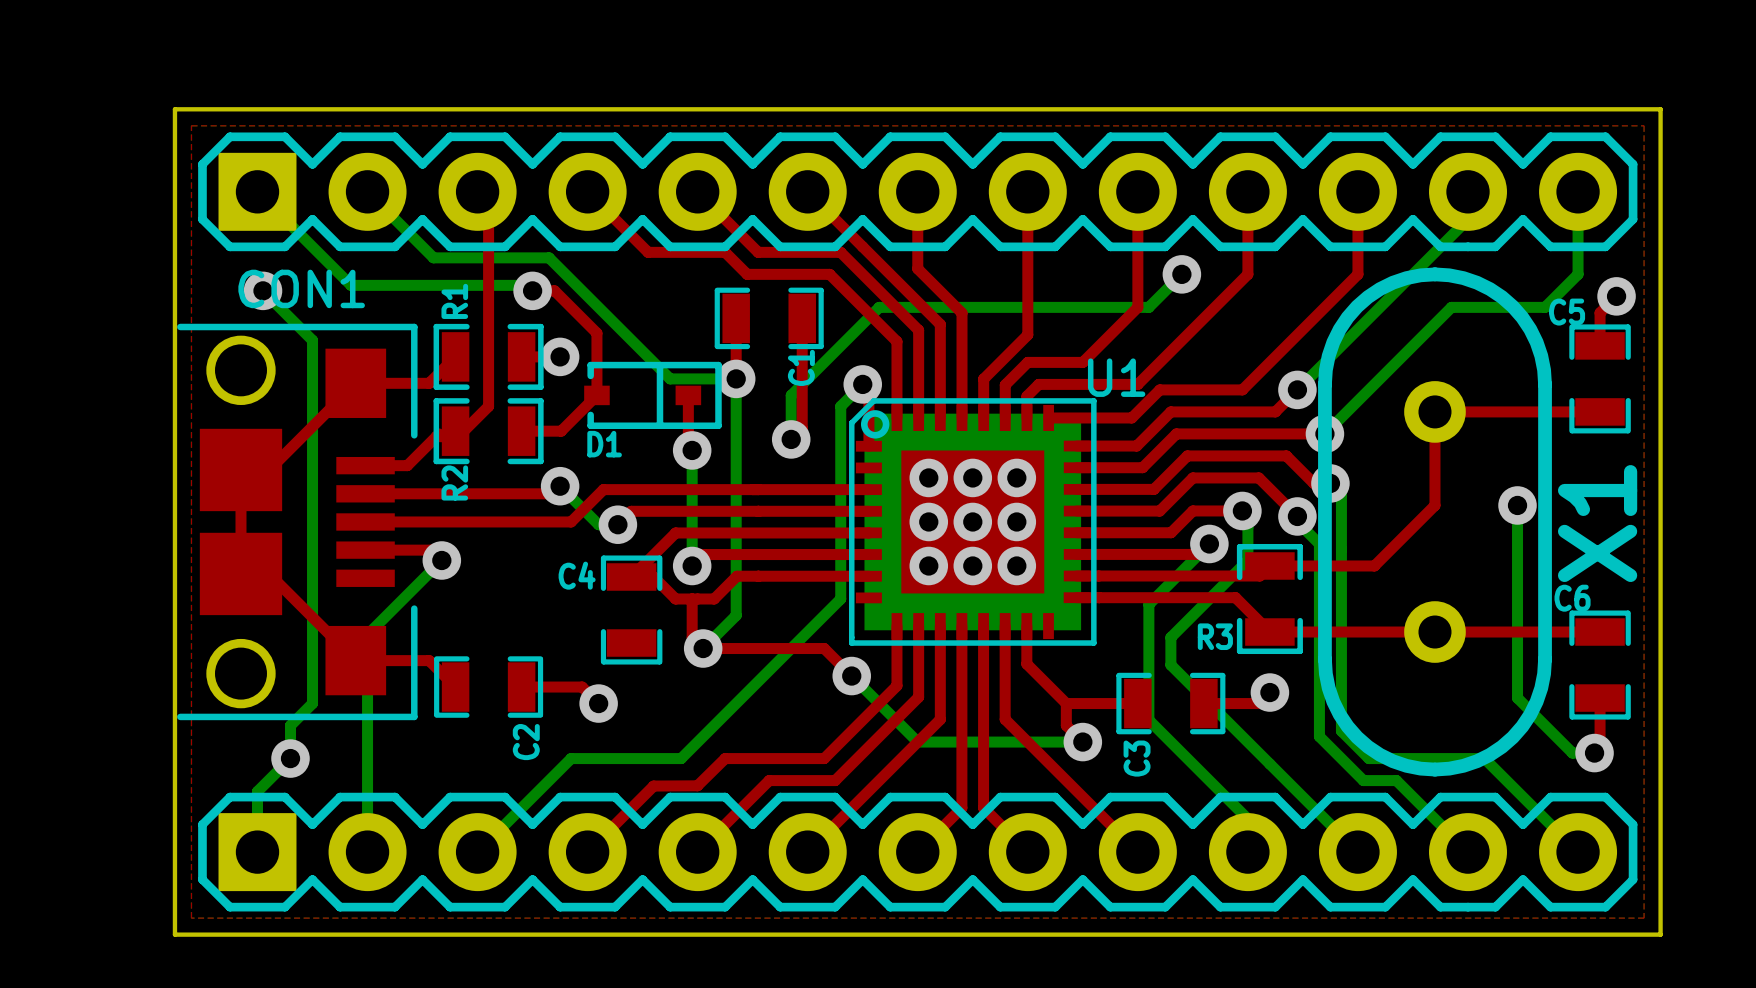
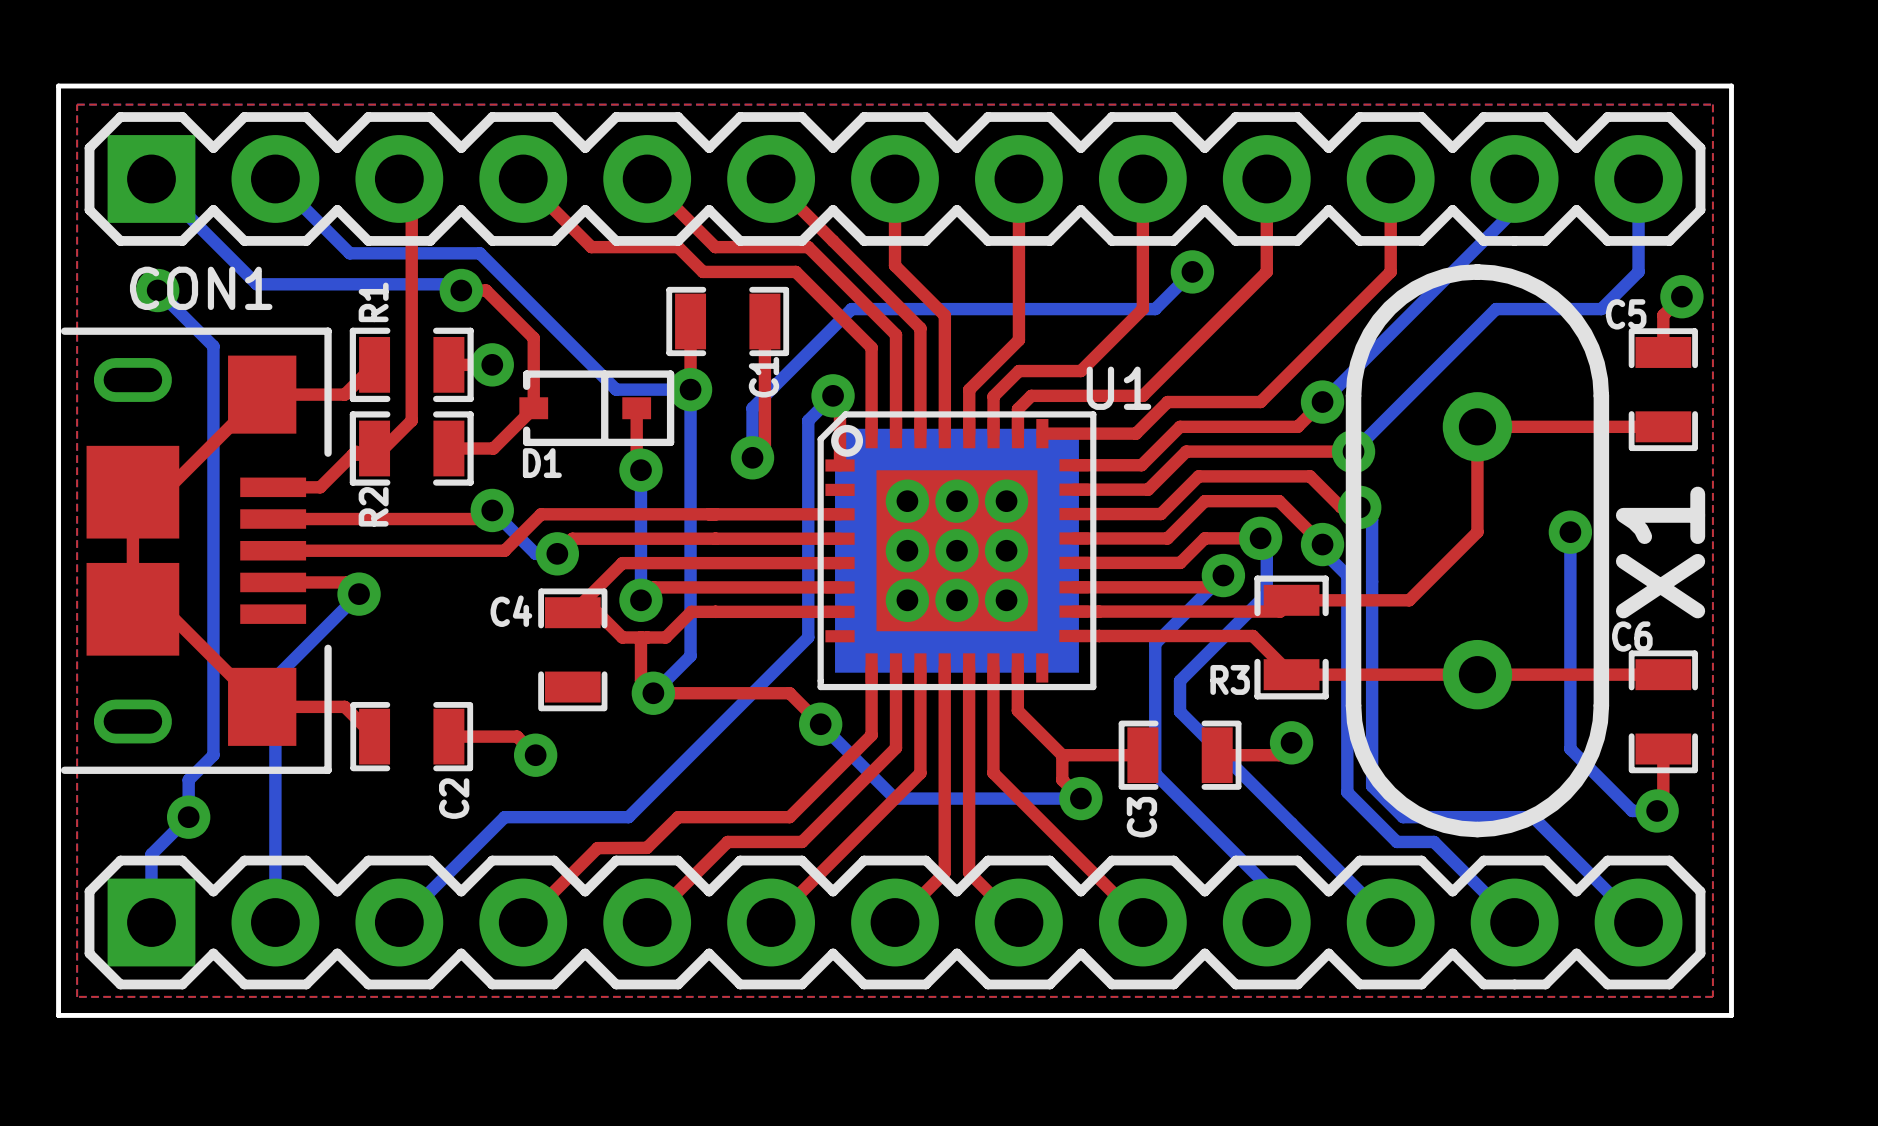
CON1 footprint: [177, 323, 418, 721] -> [60, 327, 332, 774]

